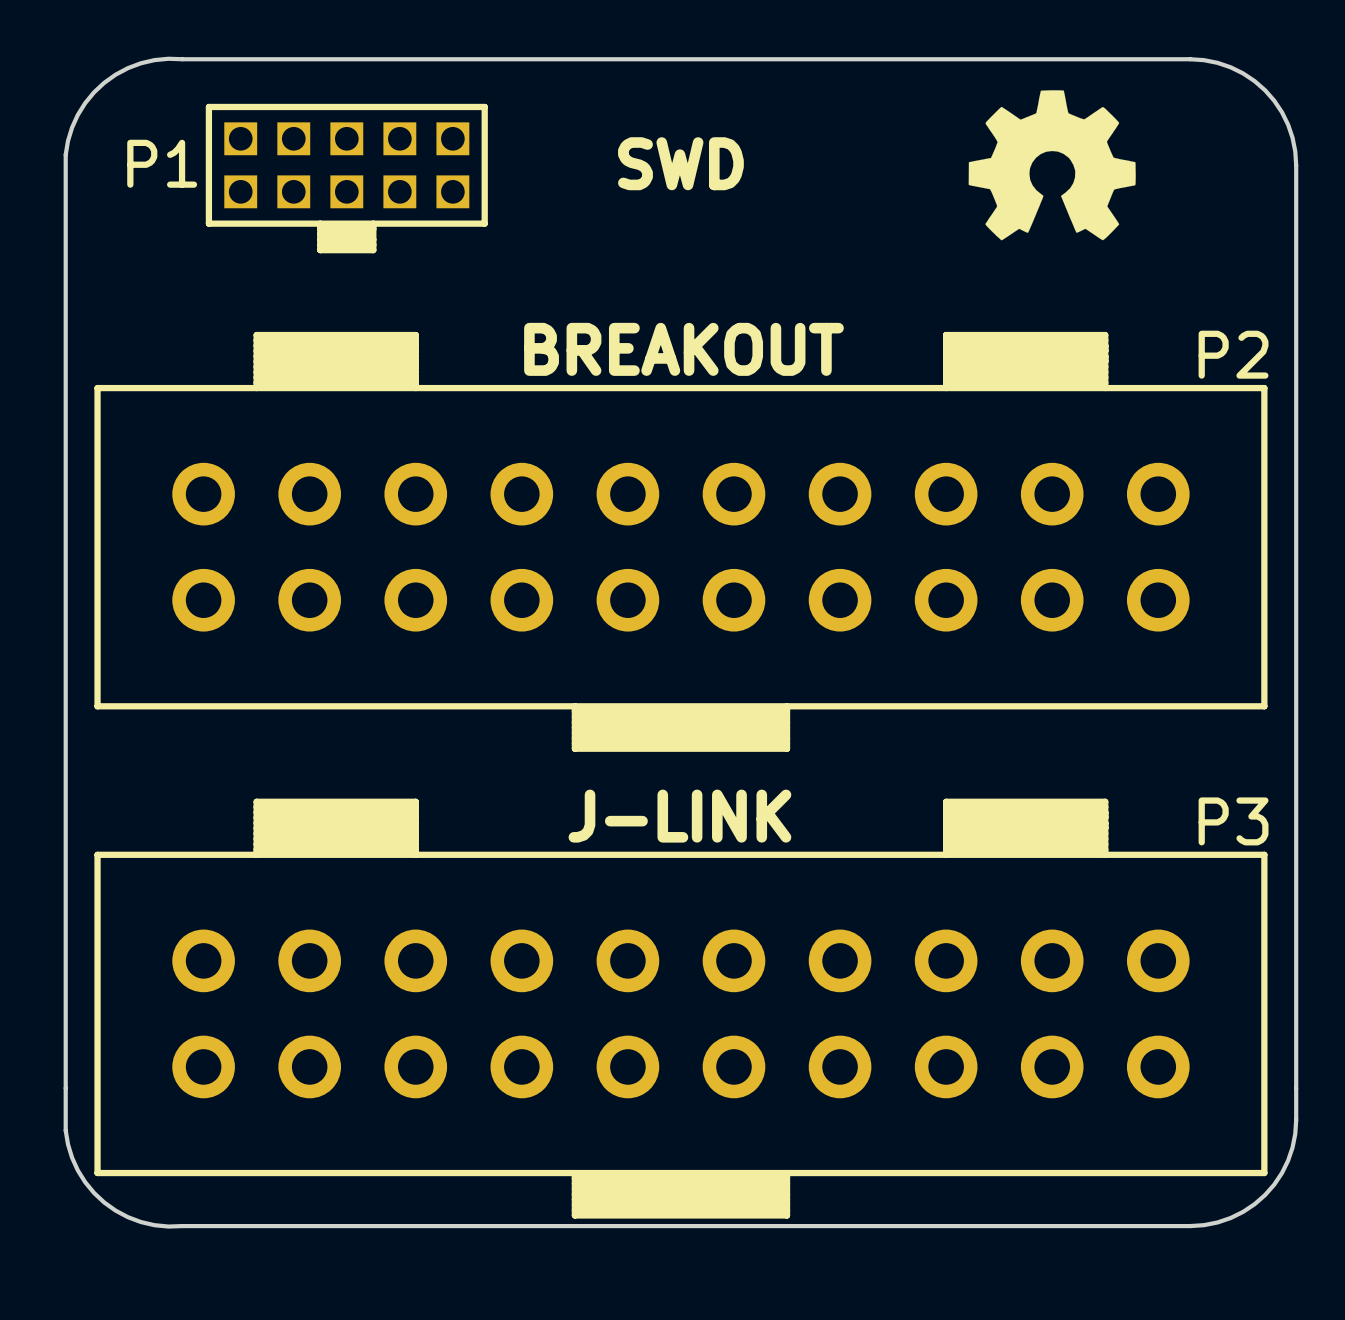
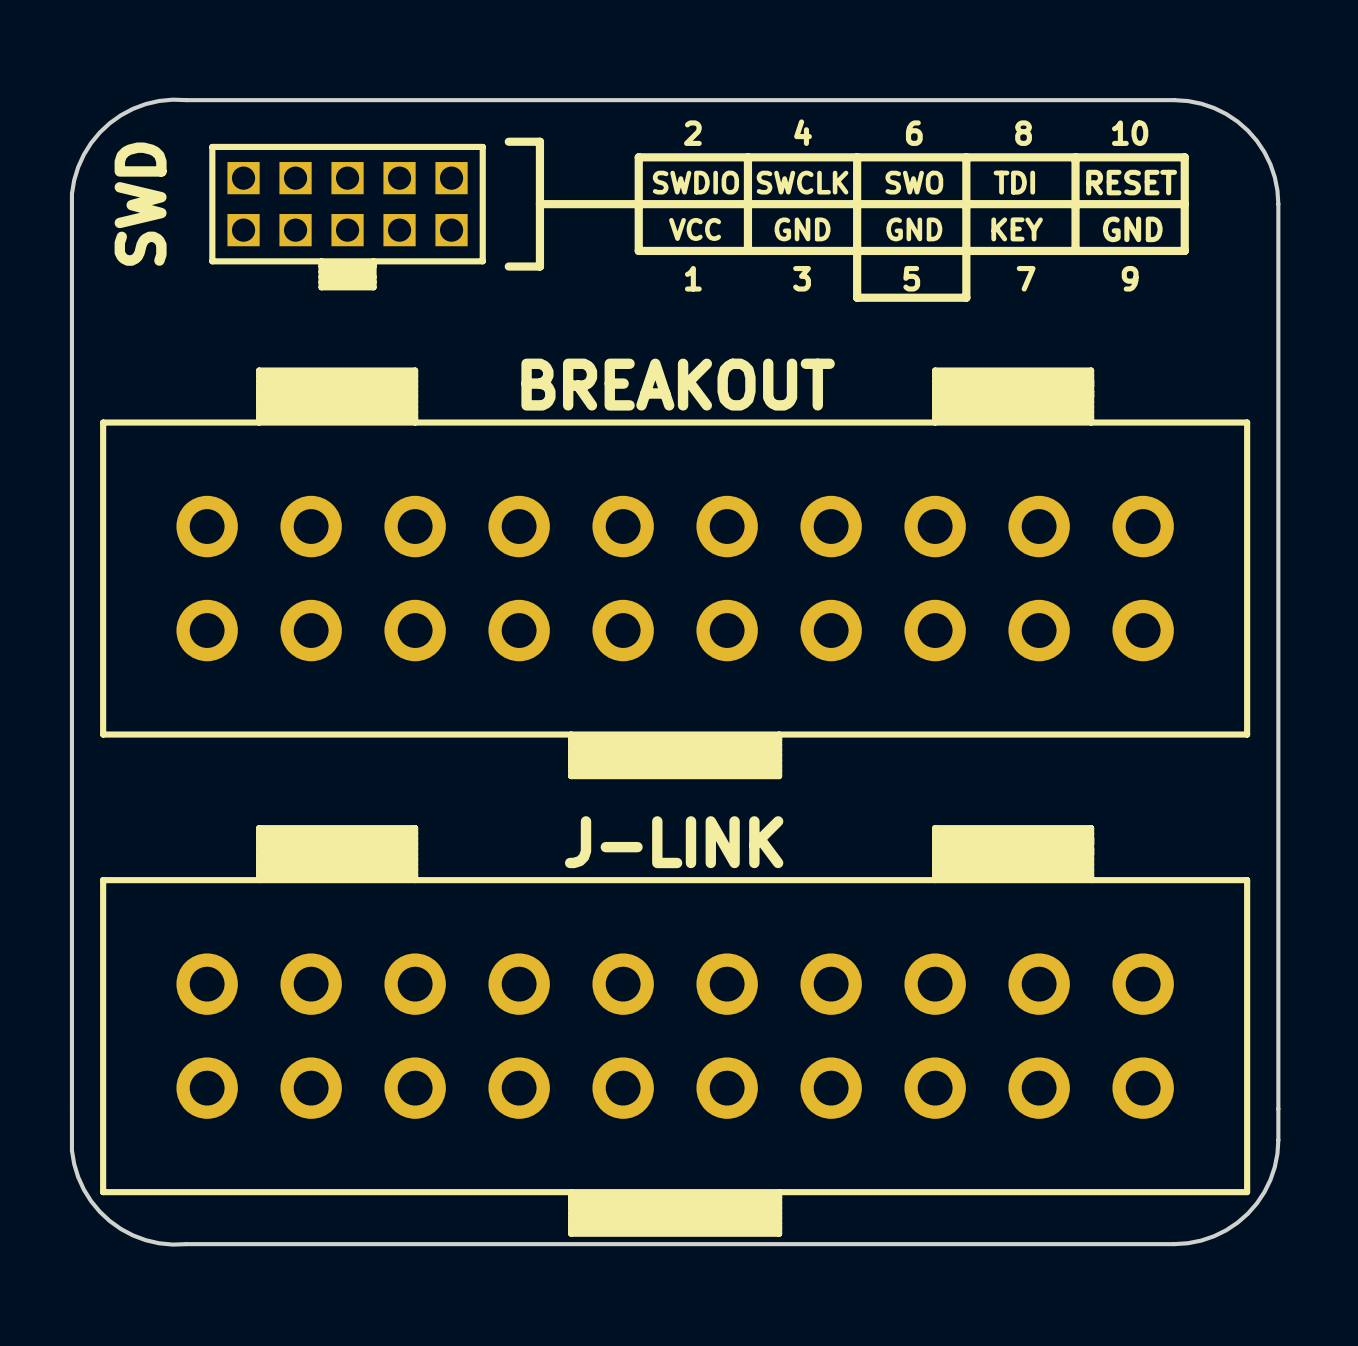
drawing: [968, 90, 1136, 241] -> none
text: none -> 2 (692, 133)
text: none -> 4 (803, 132)
text: none -> 6 (914, 133)
text: none -> 8 (1023, 133)
text: none -> 10 (1130, 133)
line: none -> (508, 141) (539, 141) (539, 266) (508, 266)
line: none -> (638, 157) (1184, 157) (1184, 250) (638, 250) (638, 157)
line: none -> (747, 157) (747, 250)
line: none -> (857, 157) (857, 297) (966, 297) (966, 157)
line: none -> (1075, 157) (1075, 250)
text: none -> SWDIO (695, 182)
text: none -> SWCLK (802, 182)
text: none -> SWO (914, 182)
text: none -> TDI (1014, 182)
text: none -> RESET (1131, 182)
P1 name: P1 (162, 163) -> none
text rotation: 0° (680, 163) -> 90° counterclockwise (140, 204)
text position: SWD (680, 163) -> SWD (140, 204)
line: none -> (539, 204) (1184, 204)
text: none -> VCC (695, 229)
text: none -> GND (802, 229)
text: none -> GND (914, 229)
text: none -> KEY (1017, 229)
text: none -> GND (1132, 229)
text: none -> 1 (693, 278)
text: none -> 3 (802, 278)
text: none -> 5 (911, 278)
text: none -> 7 (1026, 278)
text: none -> 9 (1130, 278)
P2 name: P2 (1233, 354) -> none
P3 name: P3 (1233, 821) -> none

